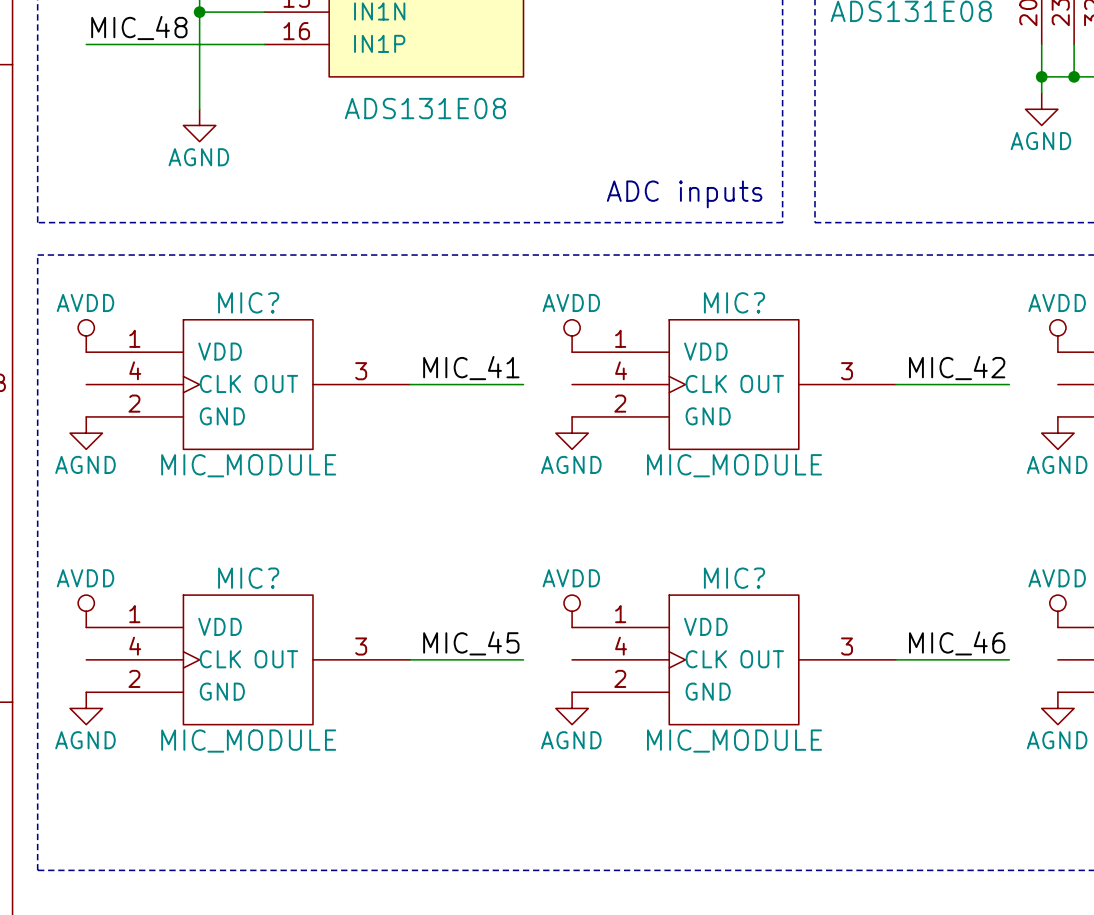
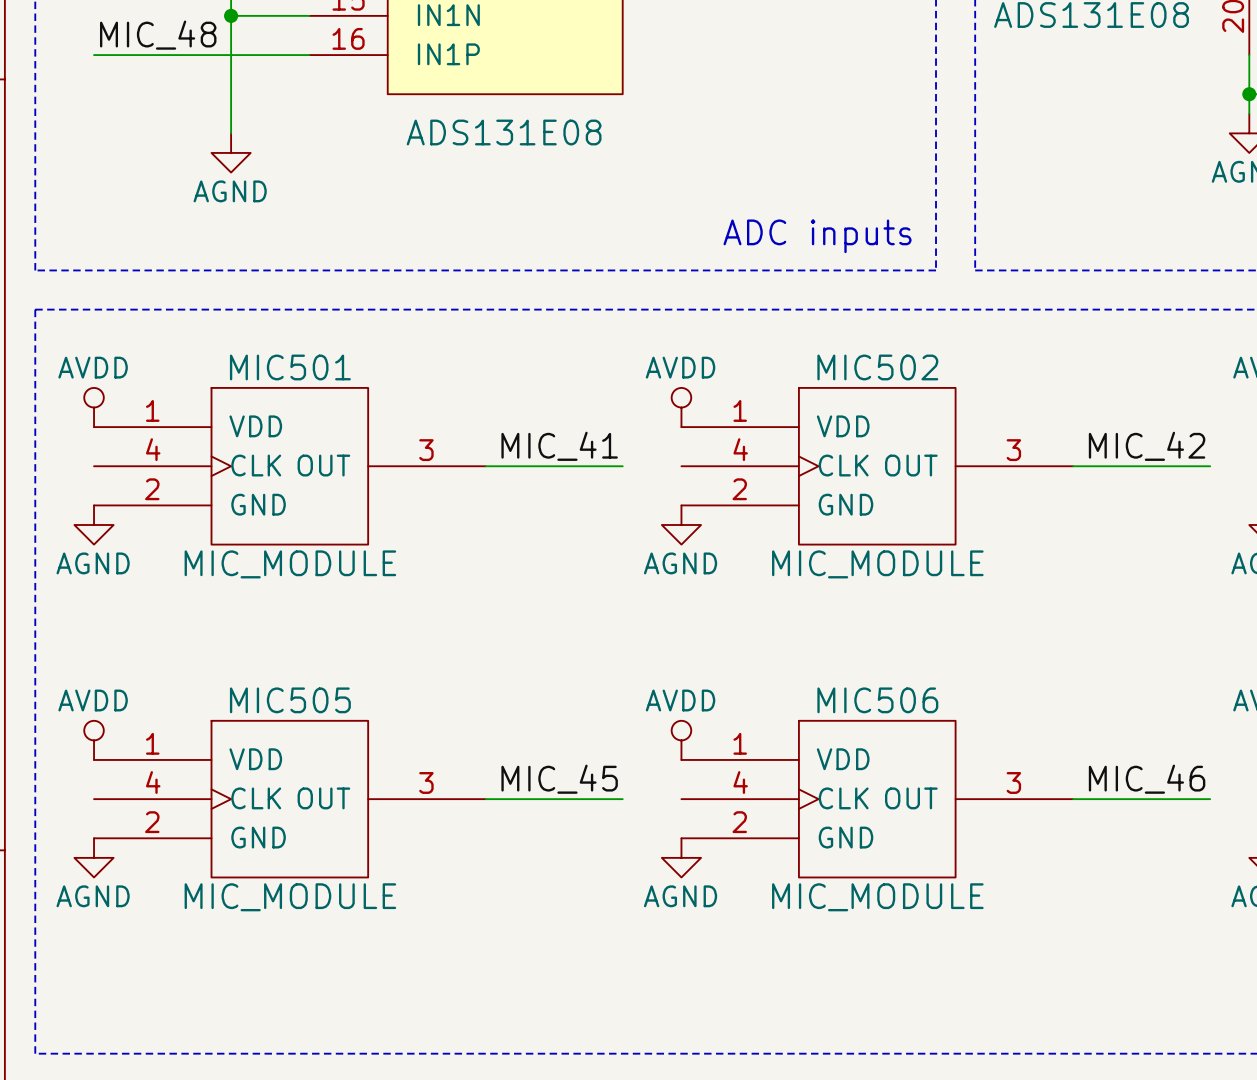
MIC? name: MIC? (248, 302) -> MIC501 (290, 367)
MIC? name: MIC? (734, 302) -> MIC502 (877, 367)
MIC? name: MIC? (248, 578) -> MIC505 (290, 700)
MIC? name: MIC? (734, 578) -> MIC506 (877, 700)

